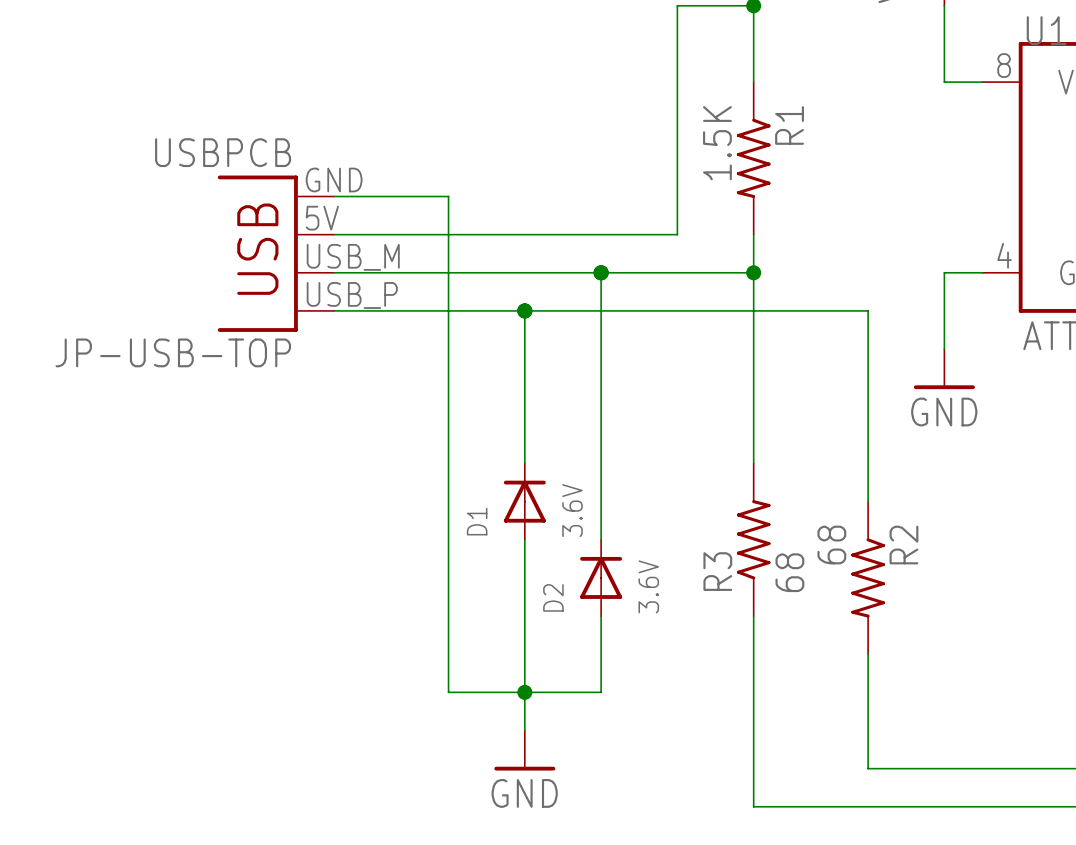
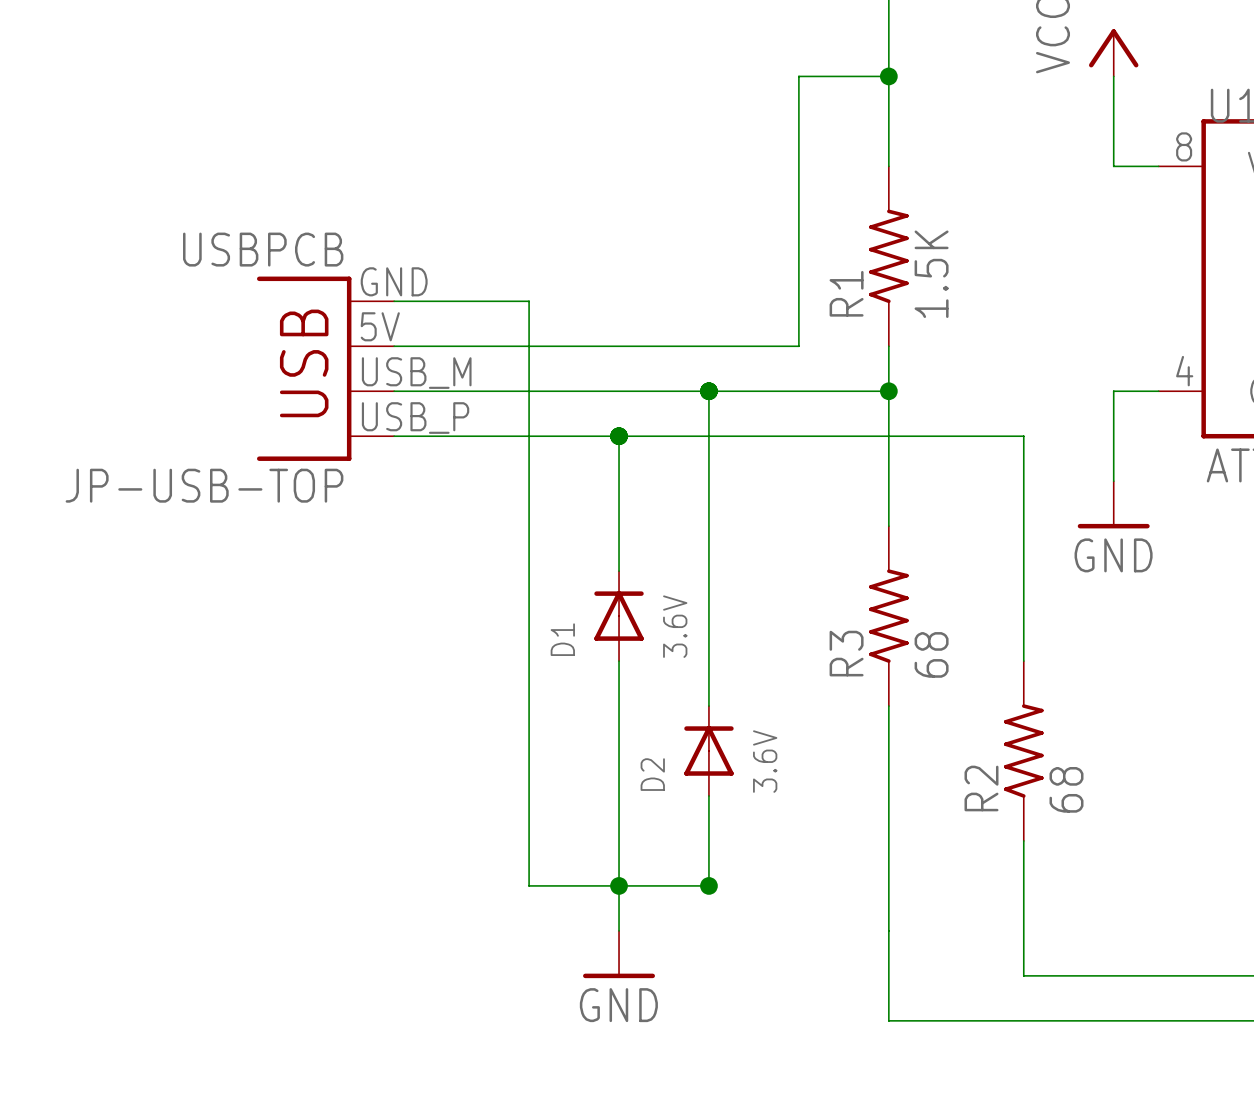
R1 rotation: 0° (753, 158) -> 180° (888, 256)
D1 position: (524, 501) -> (619, 616)
R3 position: (753, 539) -> (888, 616)
R2 rotation: 0° (868, 577) -> 180° (1023, 751)
junction: none -> (708, 885)

